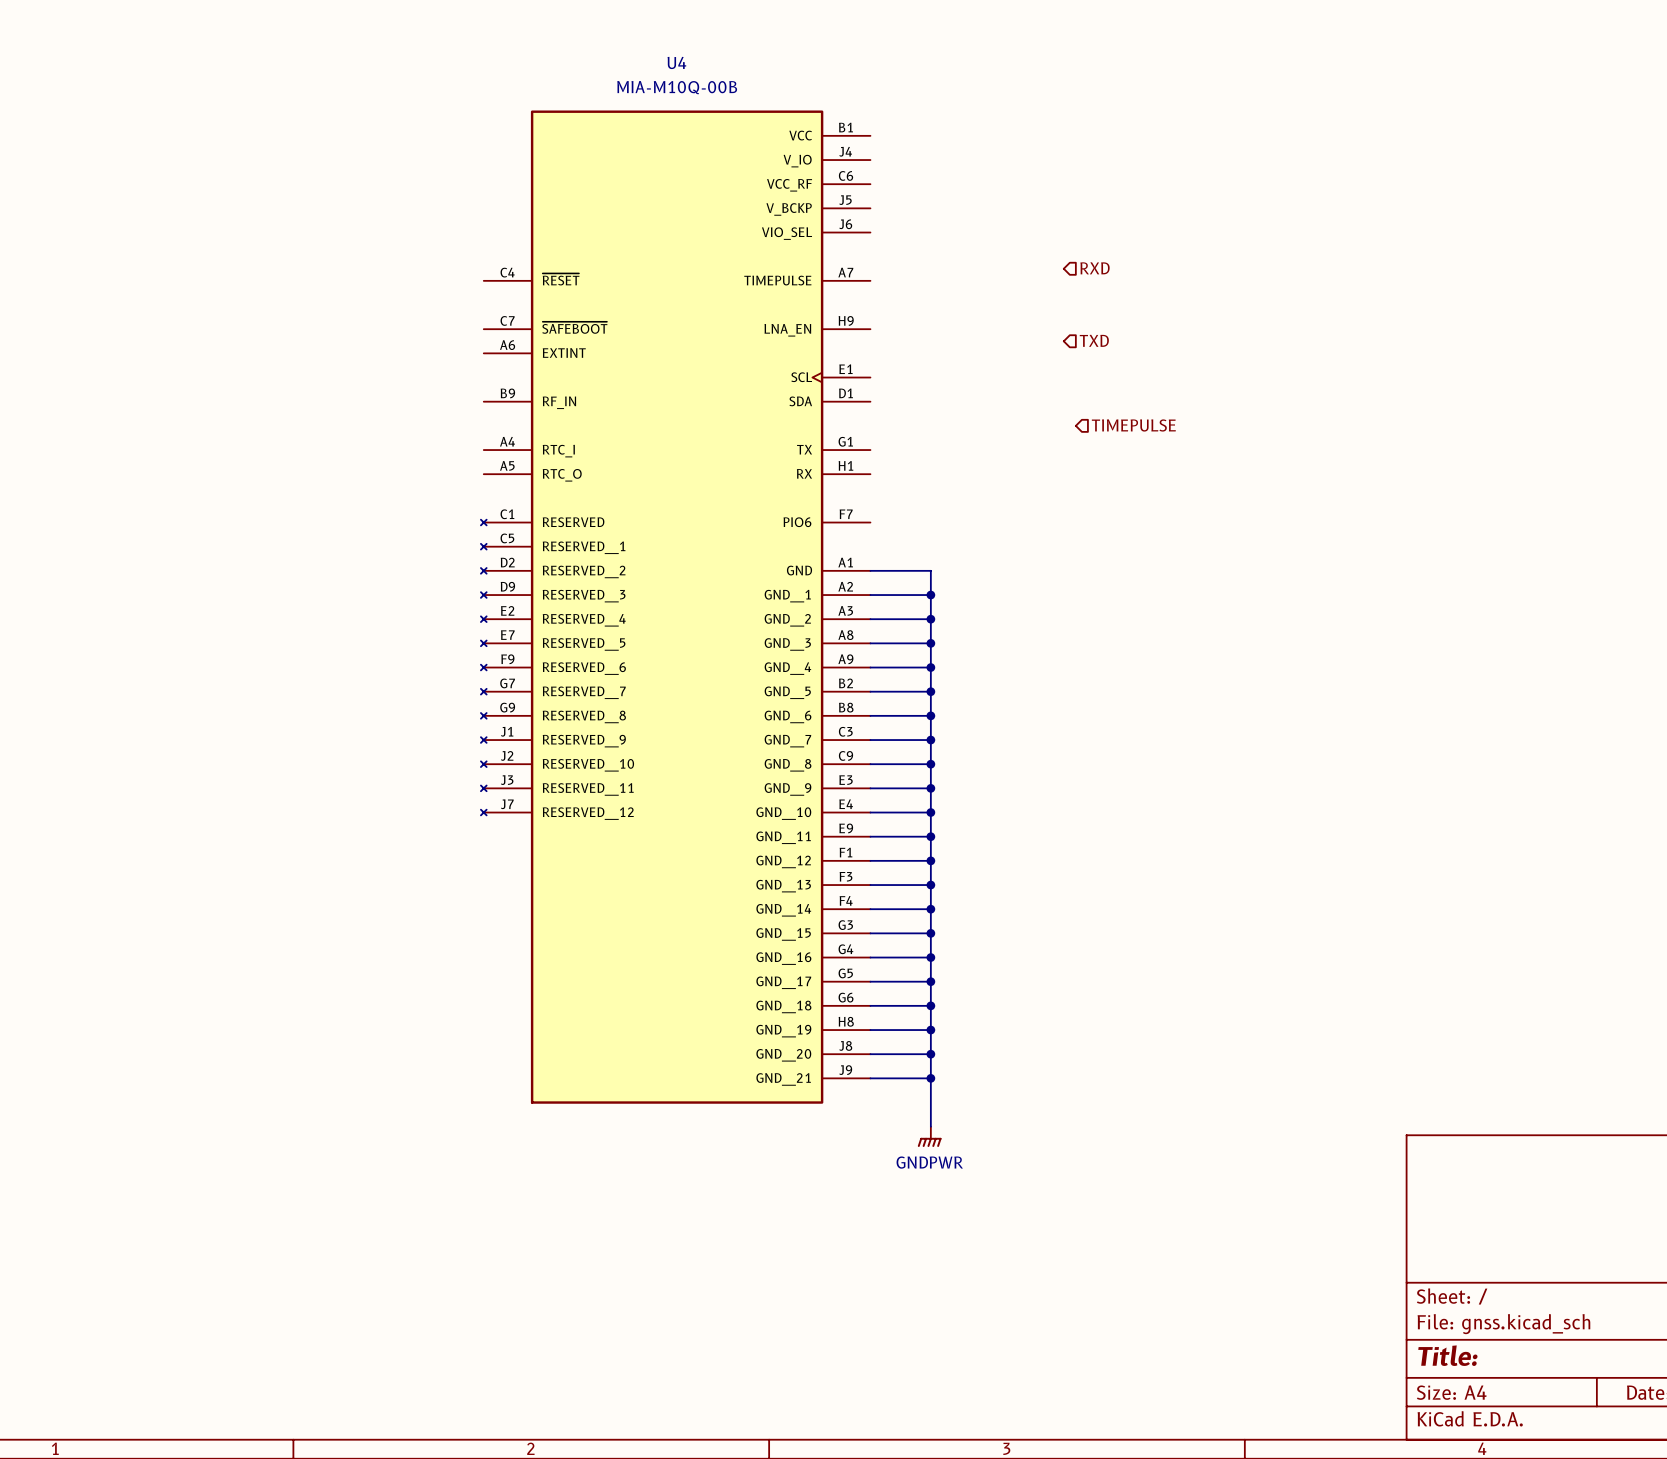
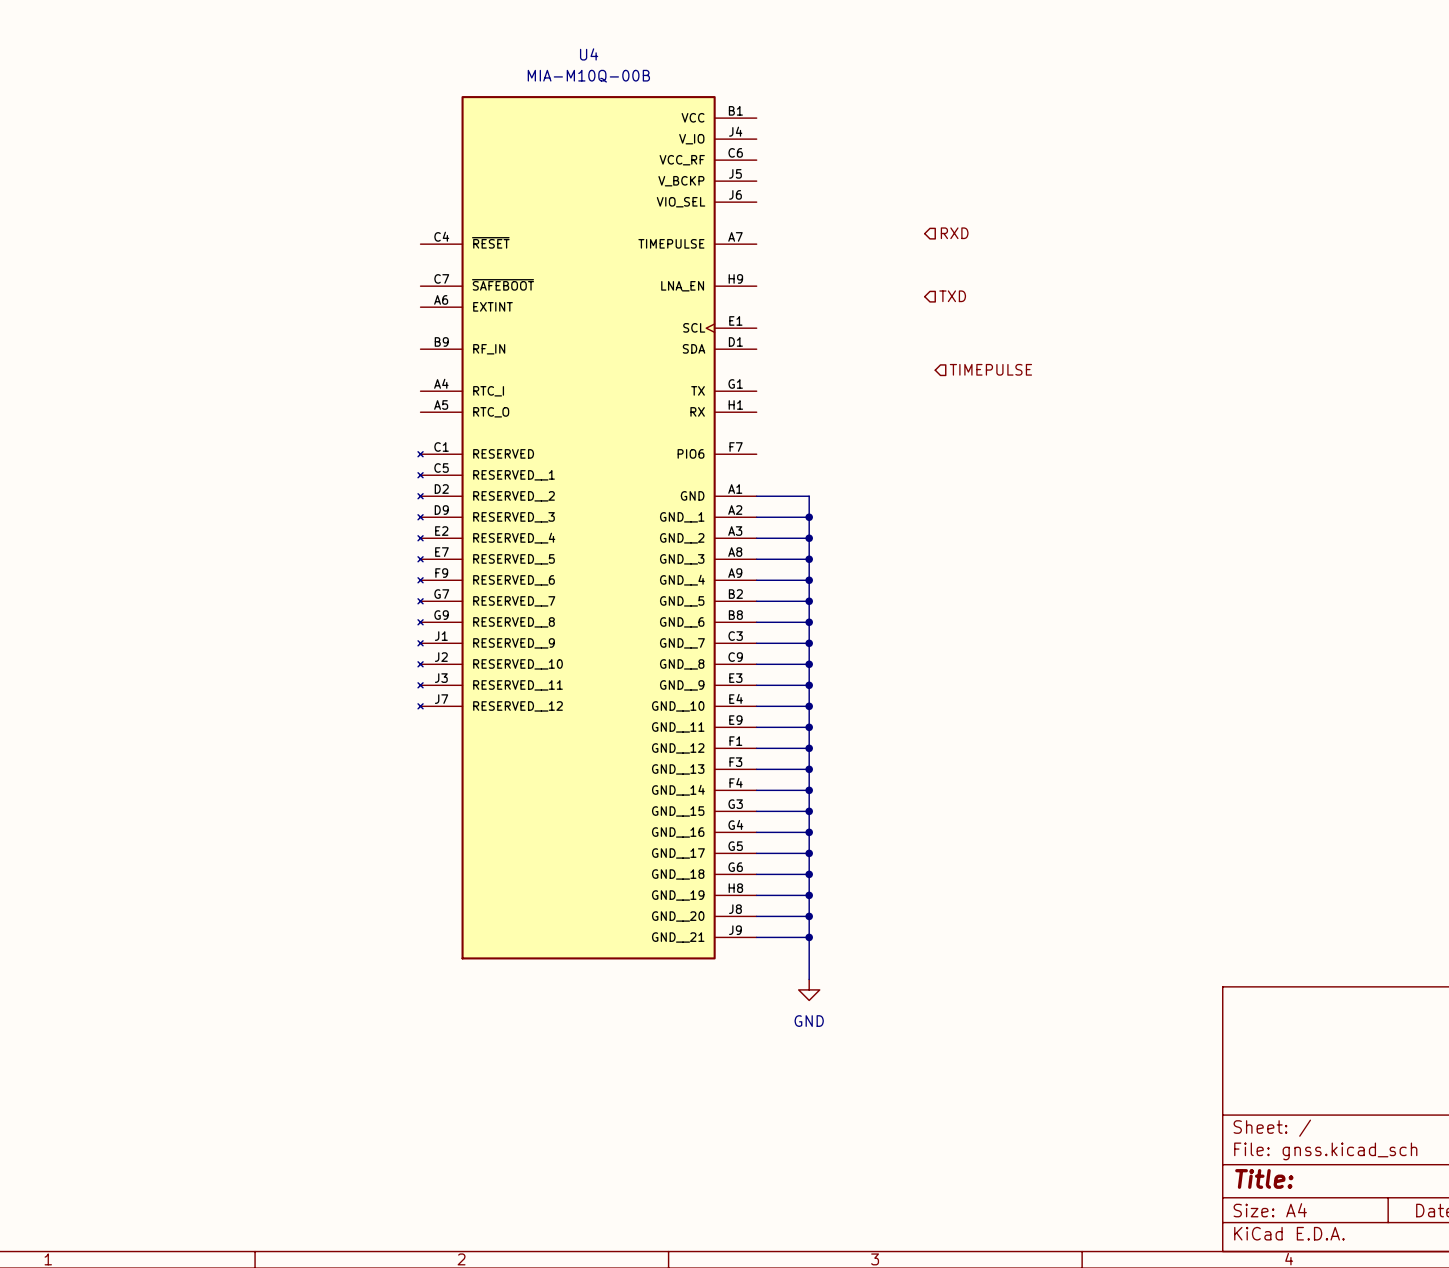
power symbol: GNDPWR (929, 1136) -> GND (809, 989)

